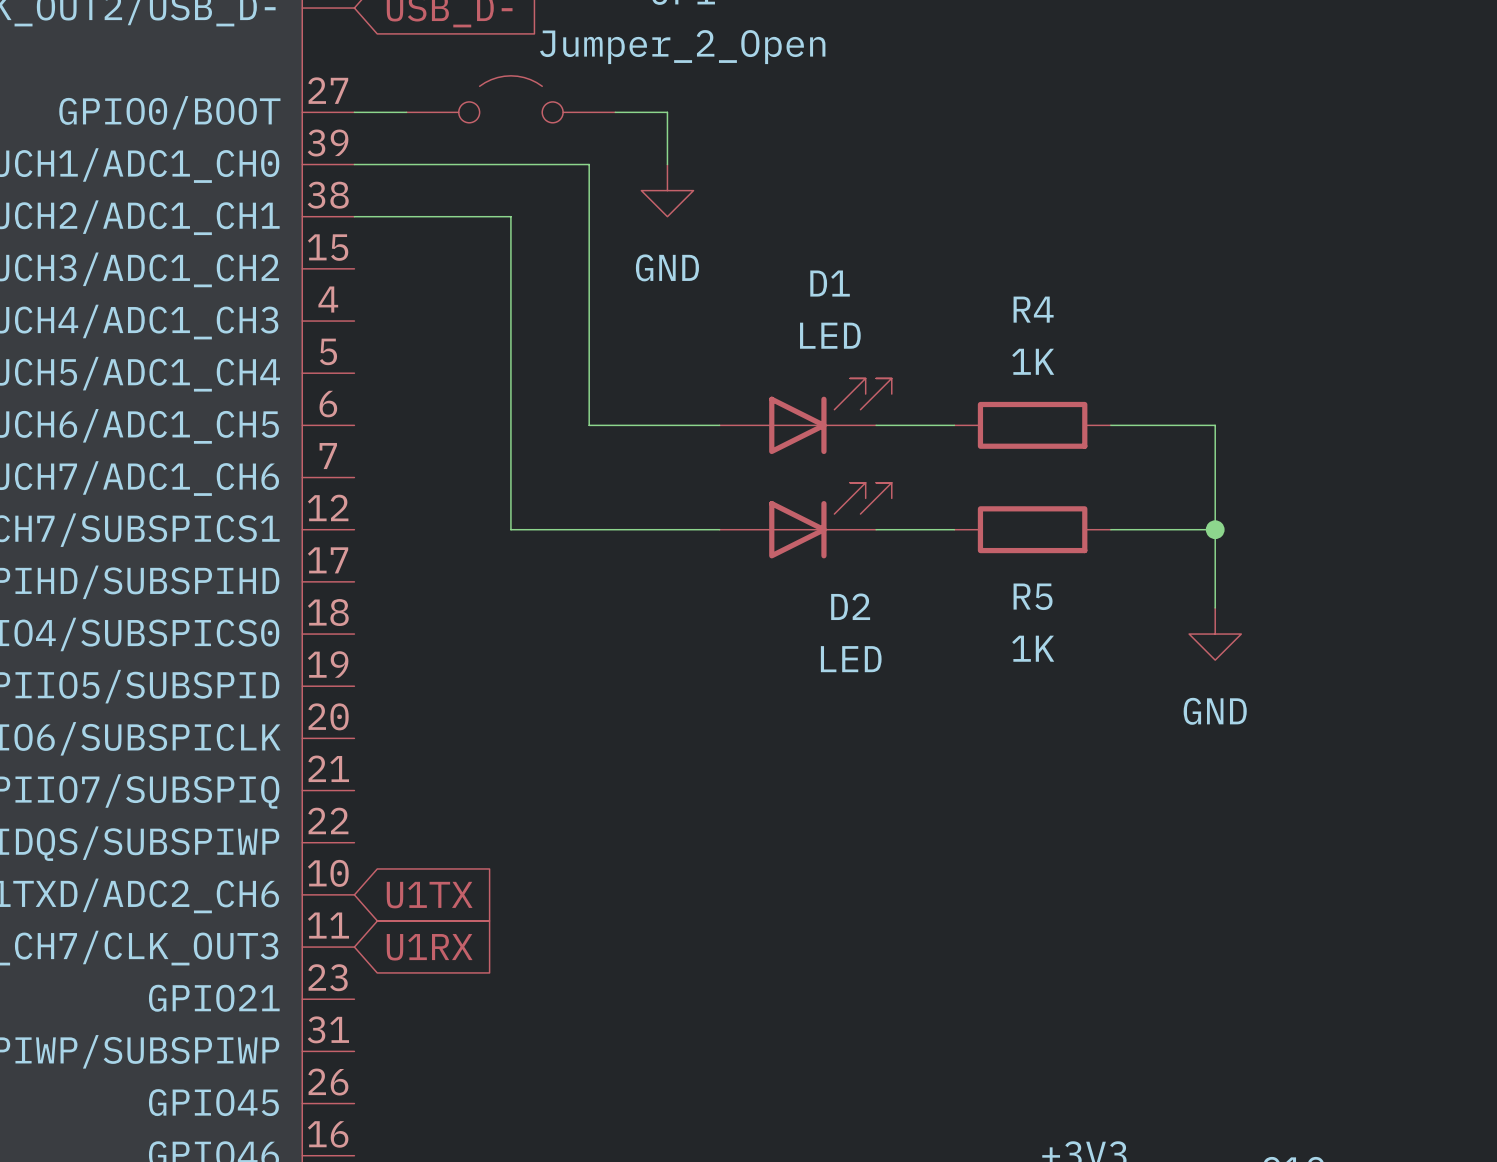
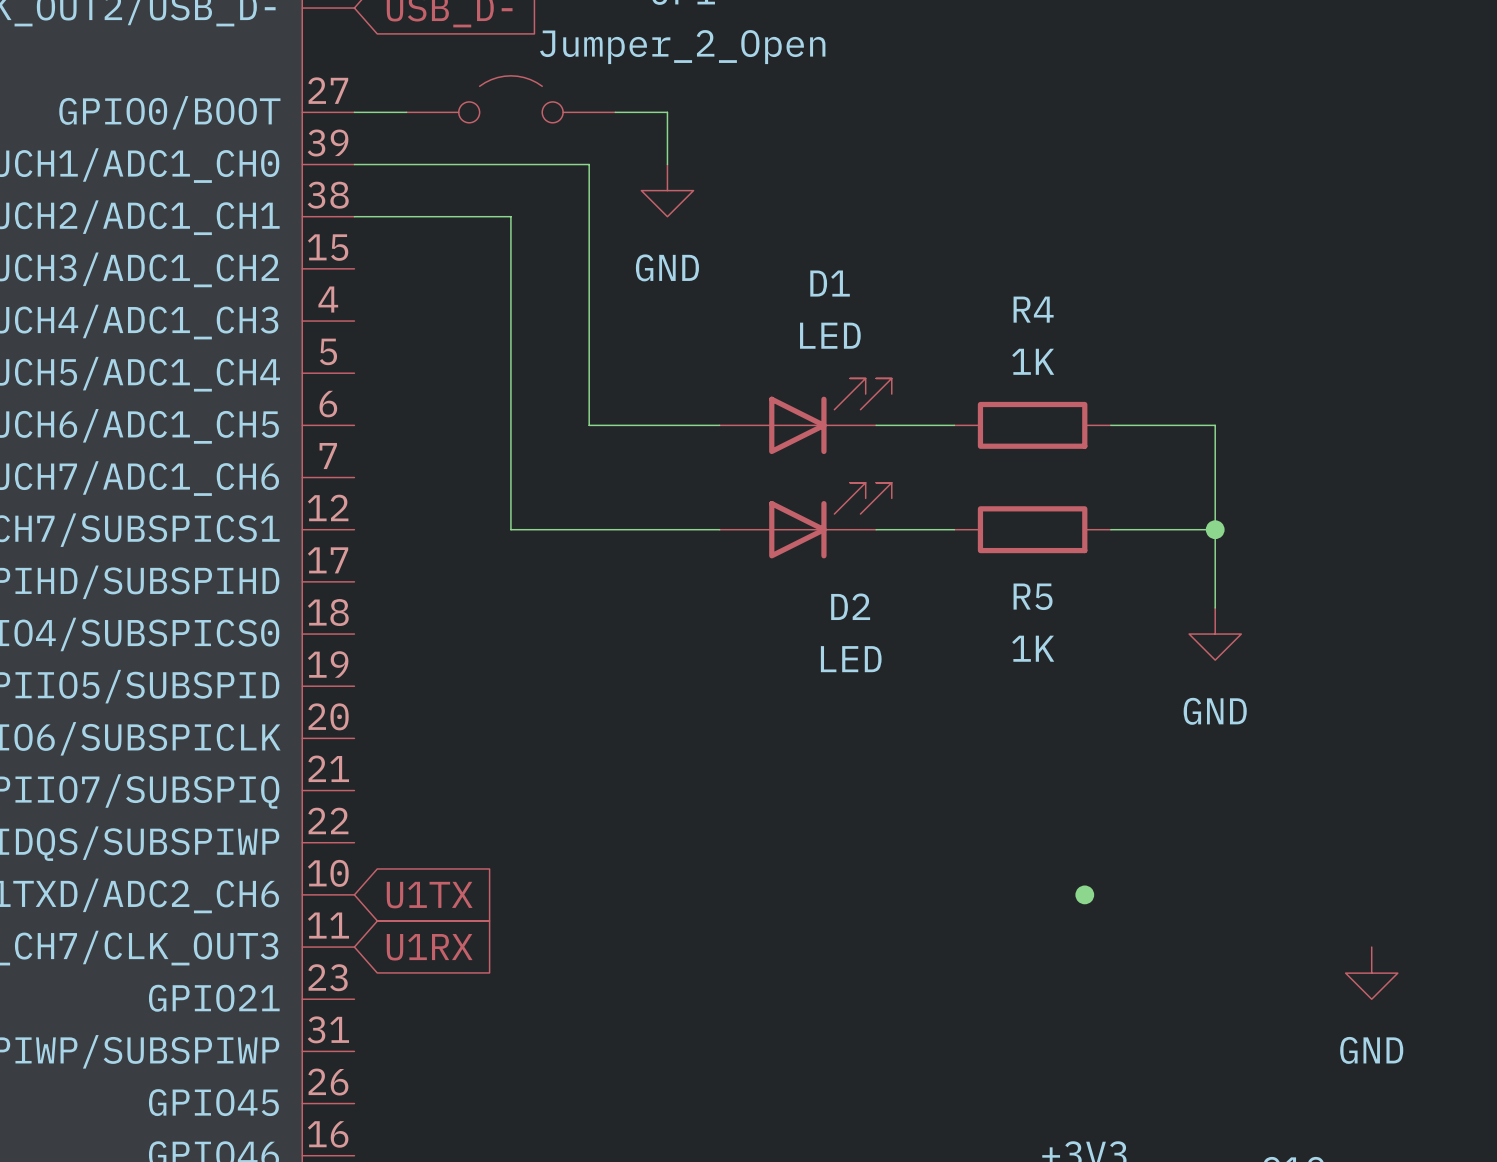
junction: none -> (1084, 894)
power symbol: none -> GND (1371, 973)

